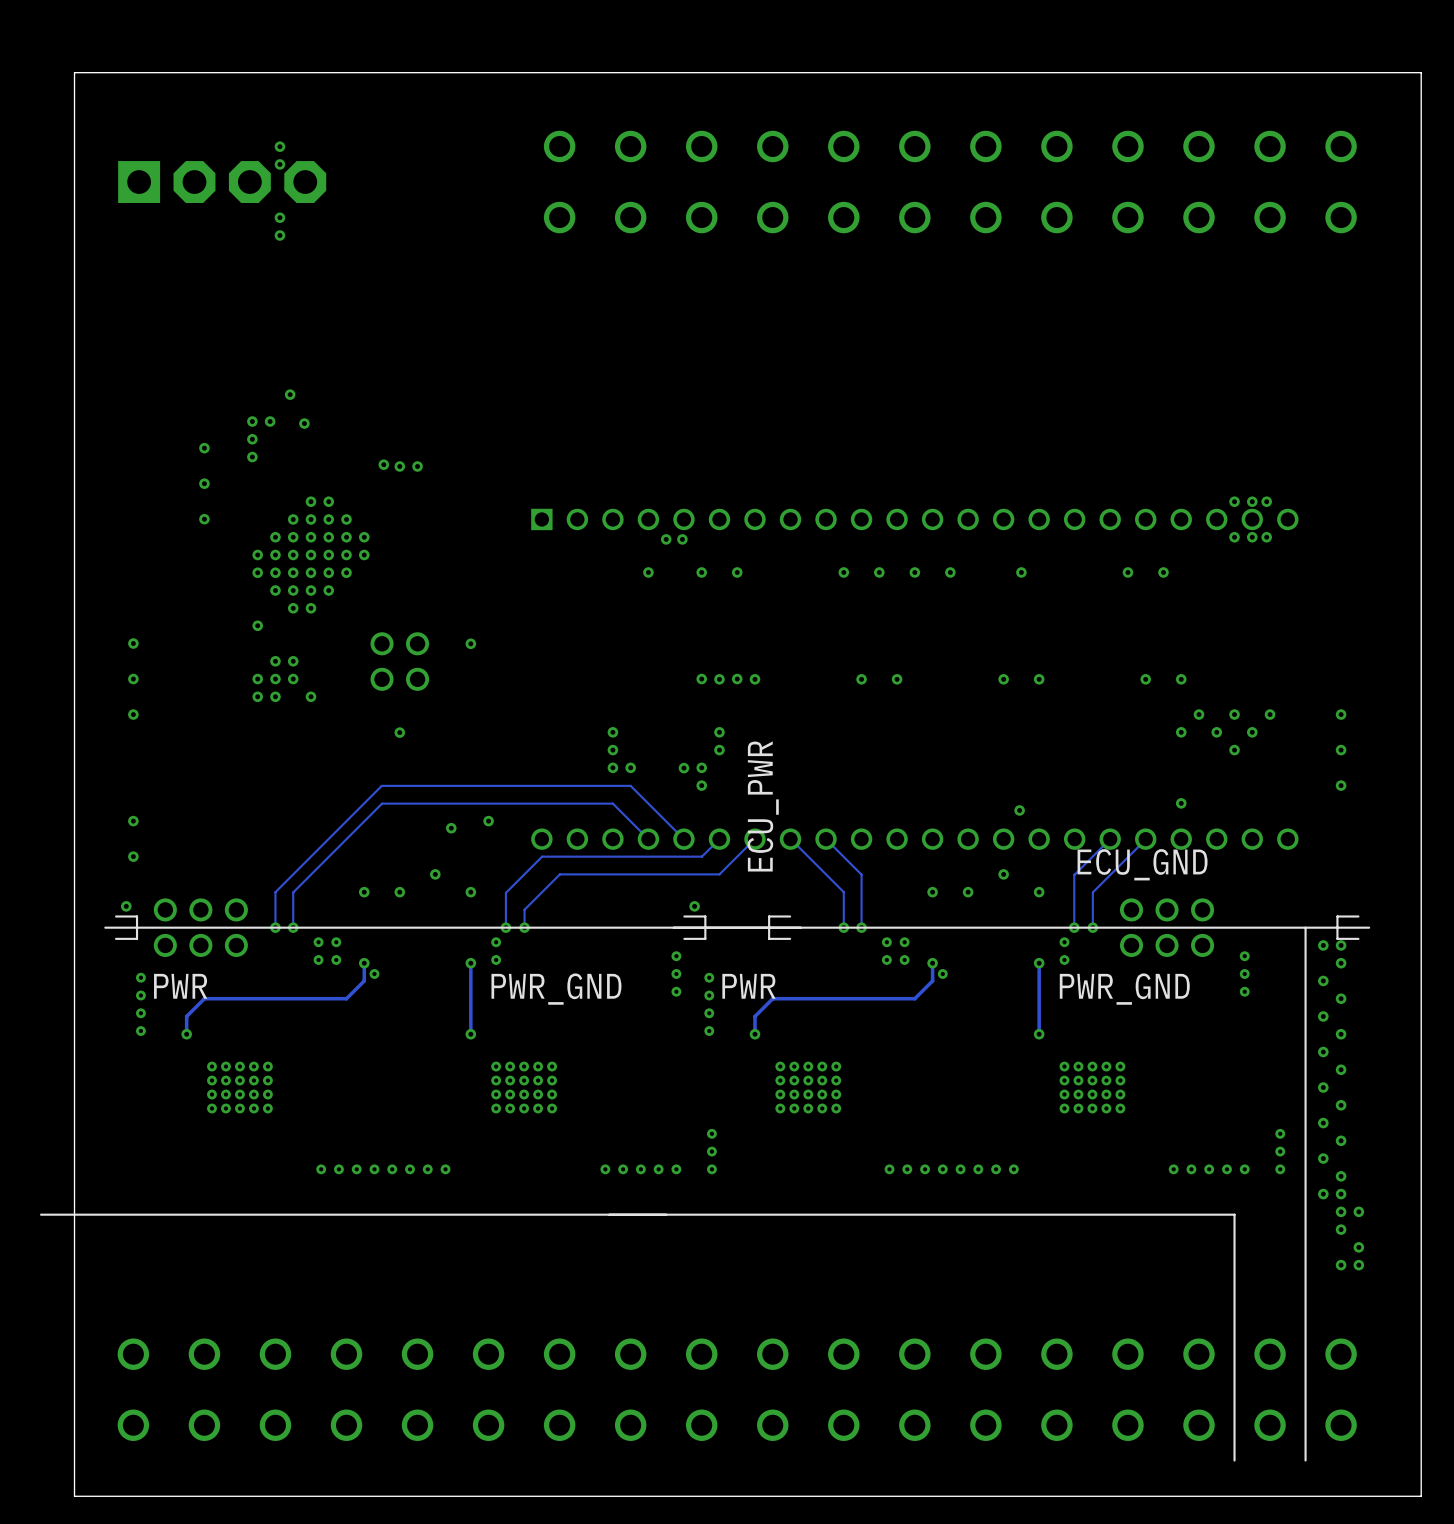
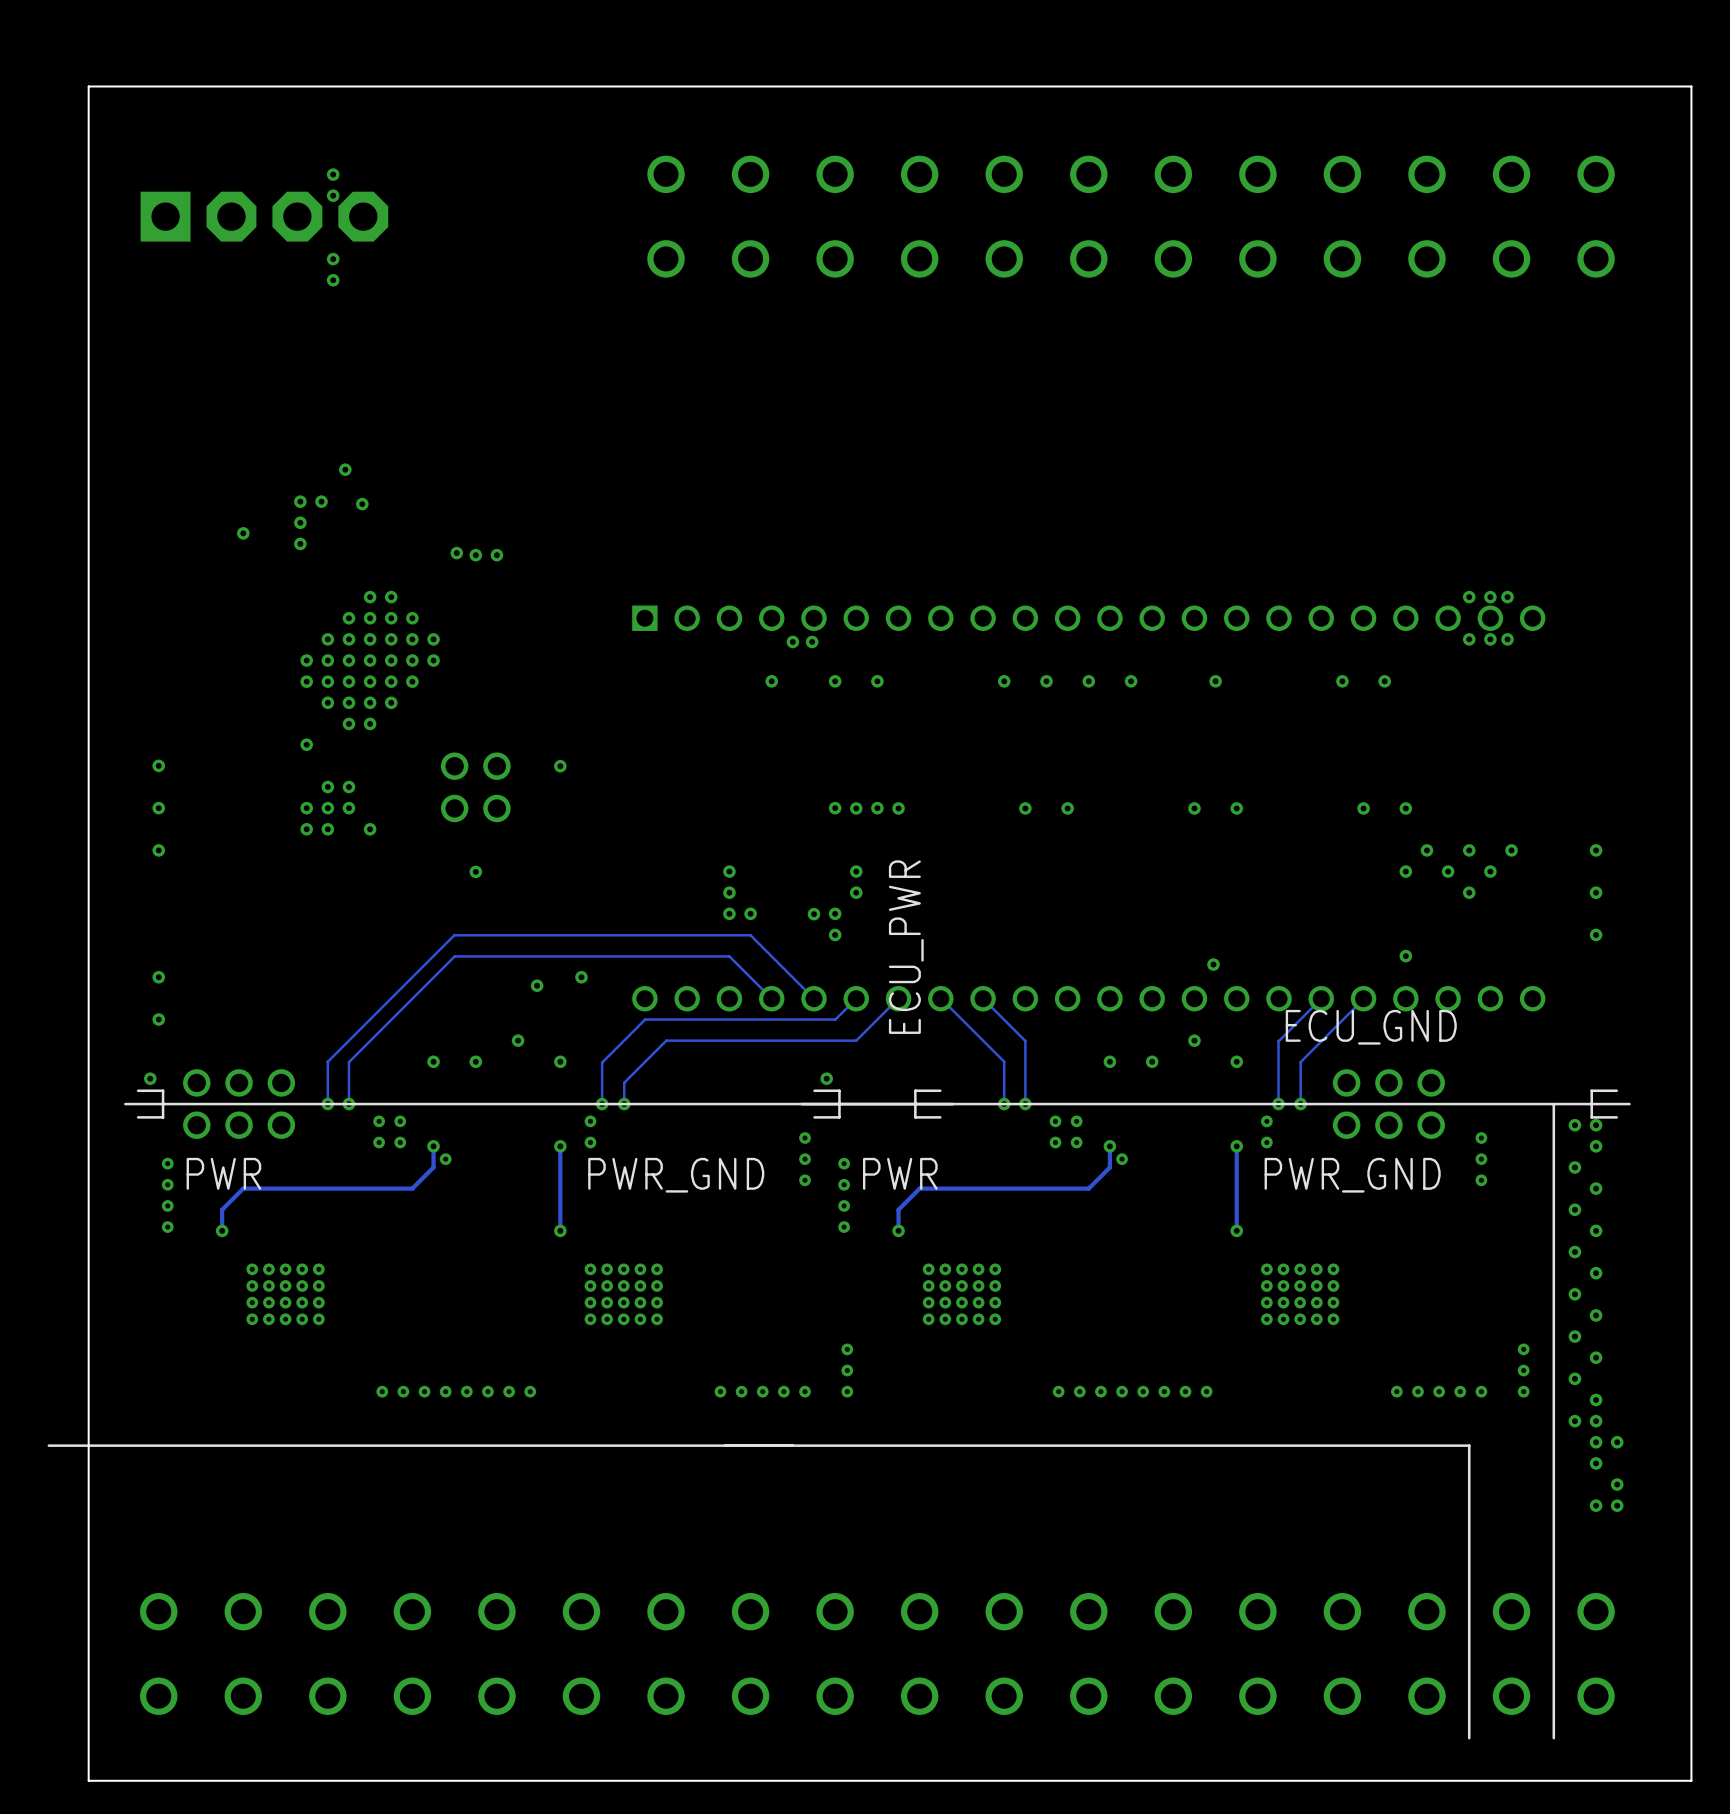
via: (204, 483) -> none
via: (204, 519) -> none

